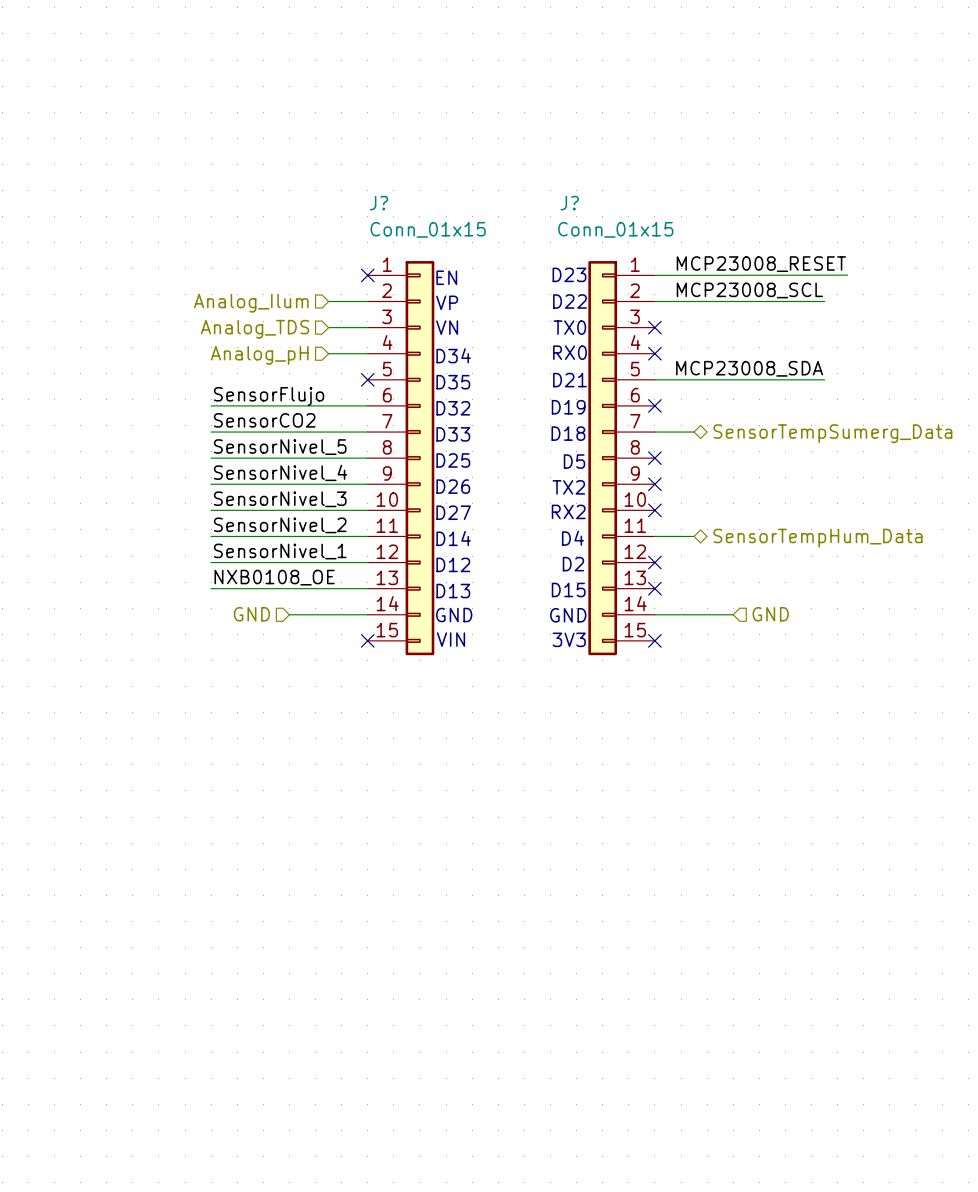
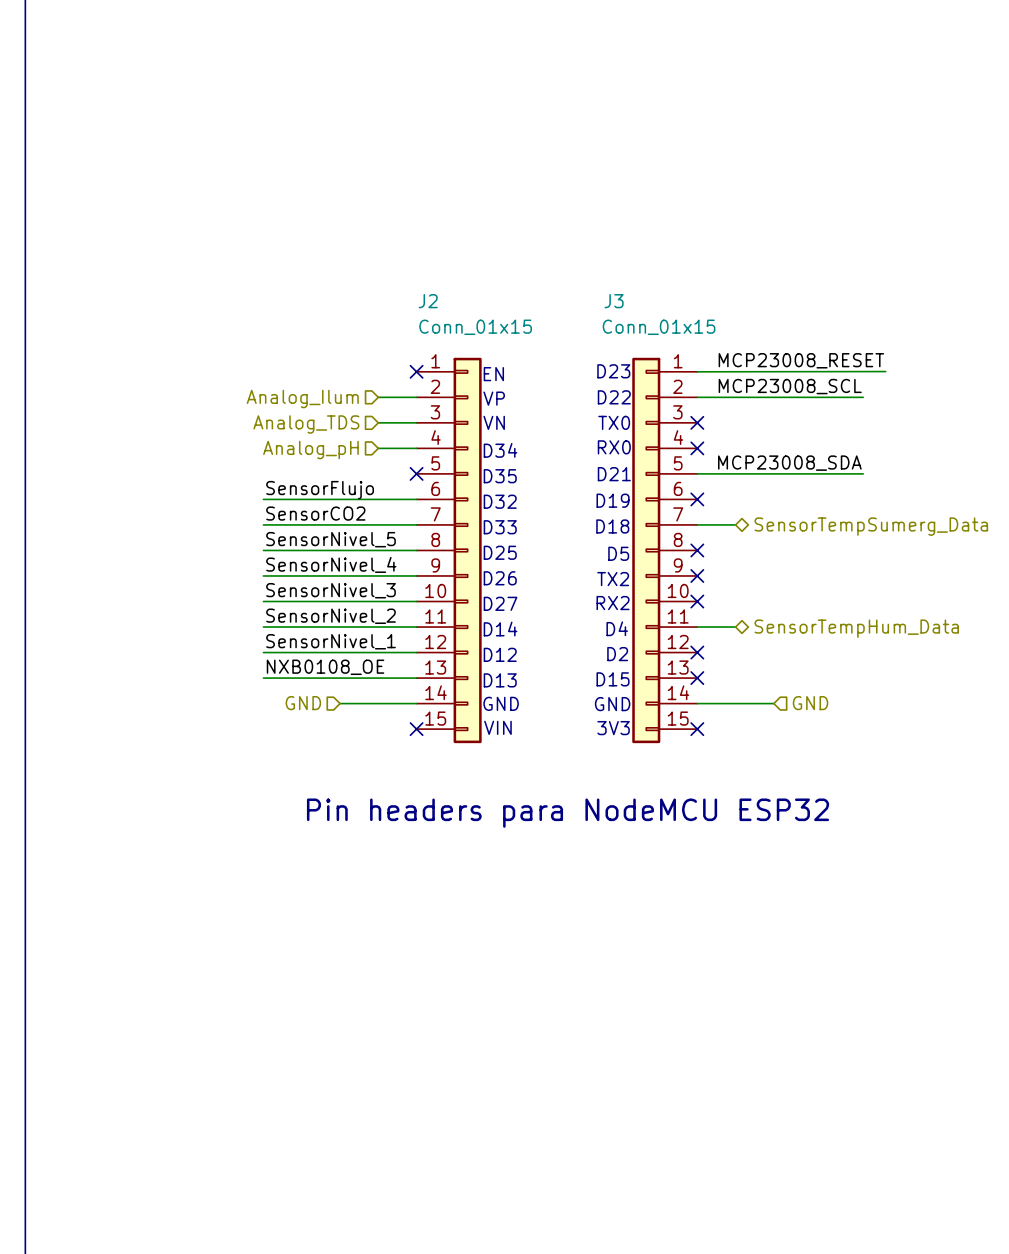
J? name: J? (379, 203) -> J2 (428, 301)
J? name: J? (569, 203) -> J3 (614, 301)
text: none -> Pin headers para NodeMCU ESP32 (568, 813)

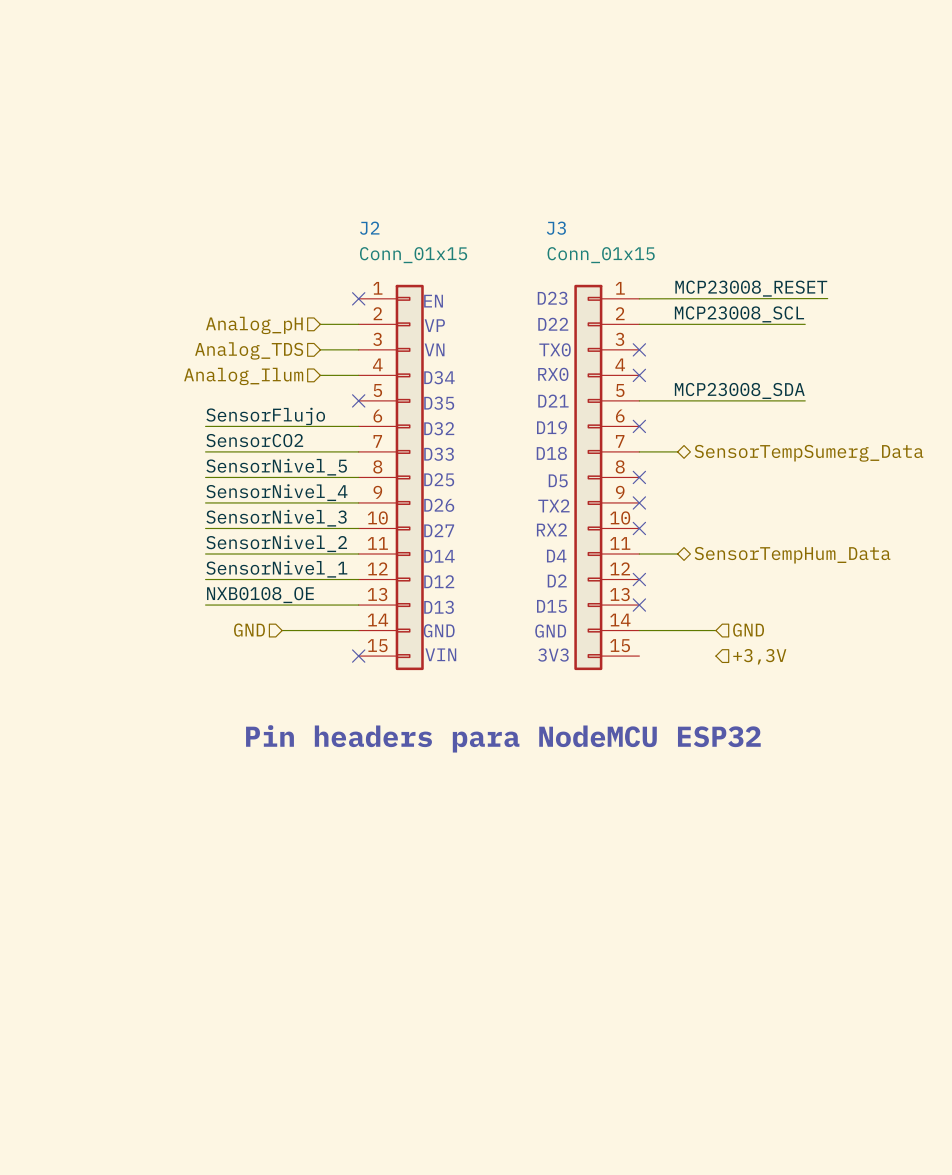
hierarchical label: Analog_Ilum (302, 398) -> Analog_pH (254, 325)
hierarchical label: Analog_pH (310, 450) -> Analog_Ilum (243, 376)
no-connect mark: (697, 729) -> none
hierarchical label: none -> +3,3V (759, 656)

